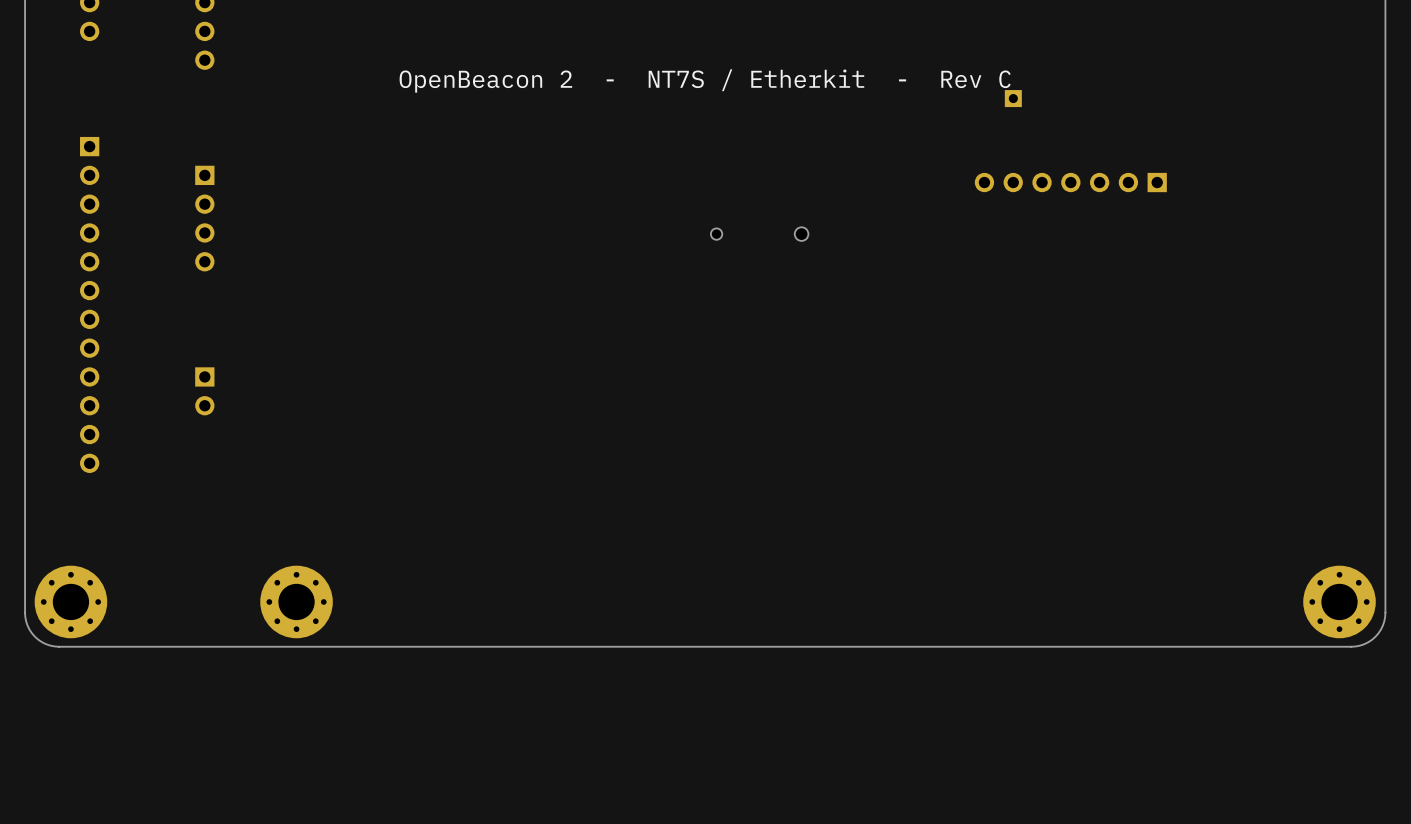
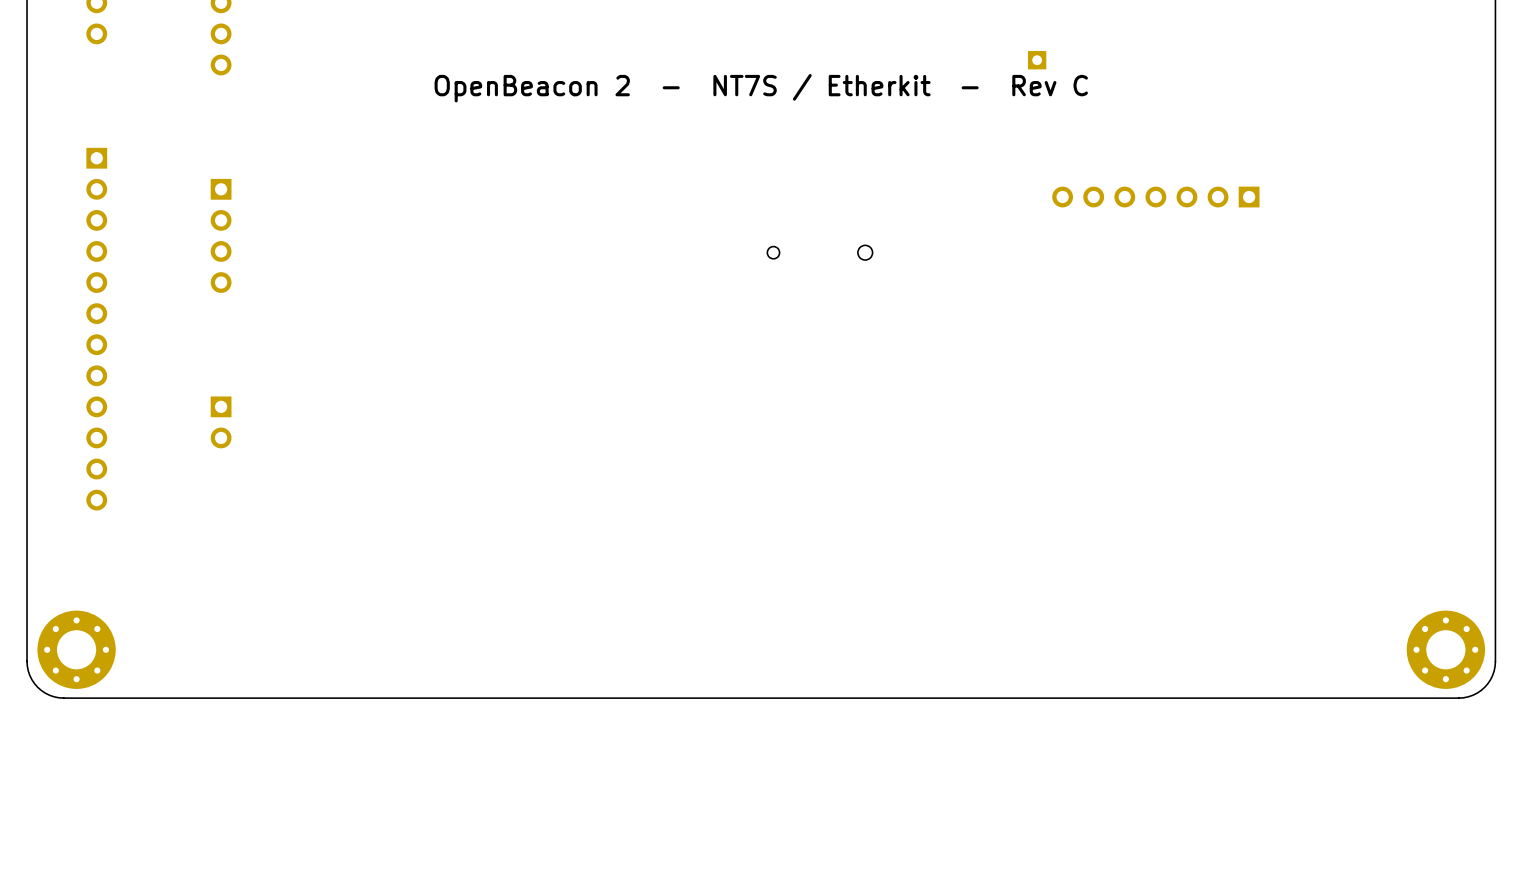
part position: (1013, 98) -> (1037, 60)
part: (296, 601) -> none

